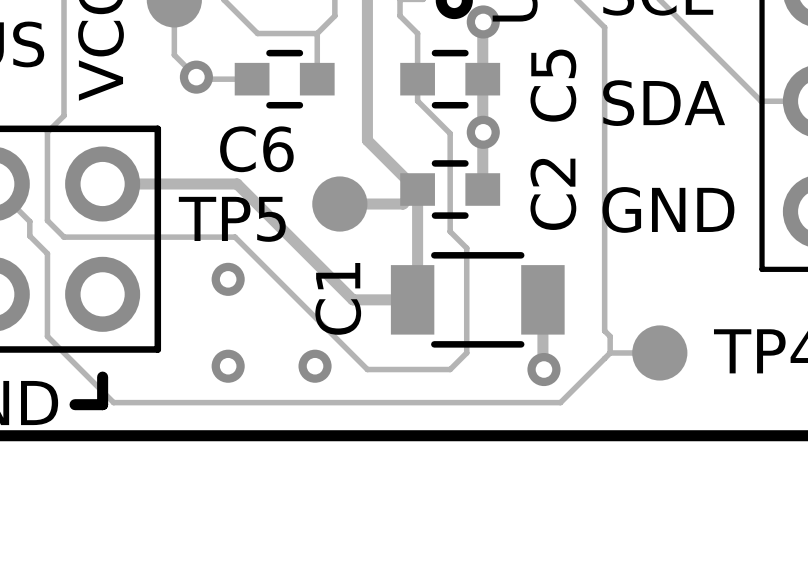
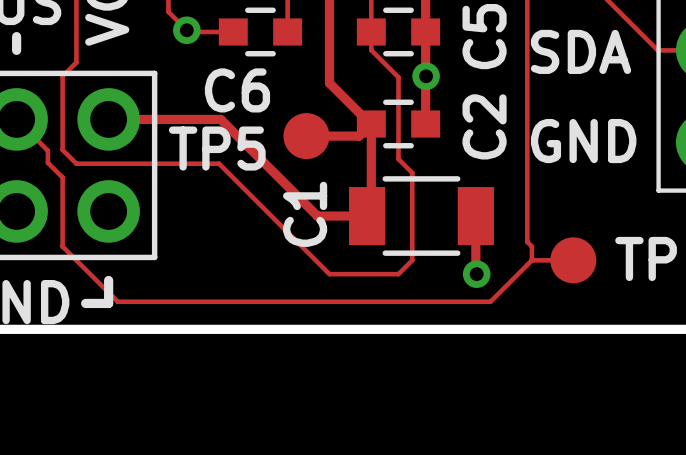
via: (228, 279) -> none
via: (228, 366) -> none
via: (315, 366) -> none

